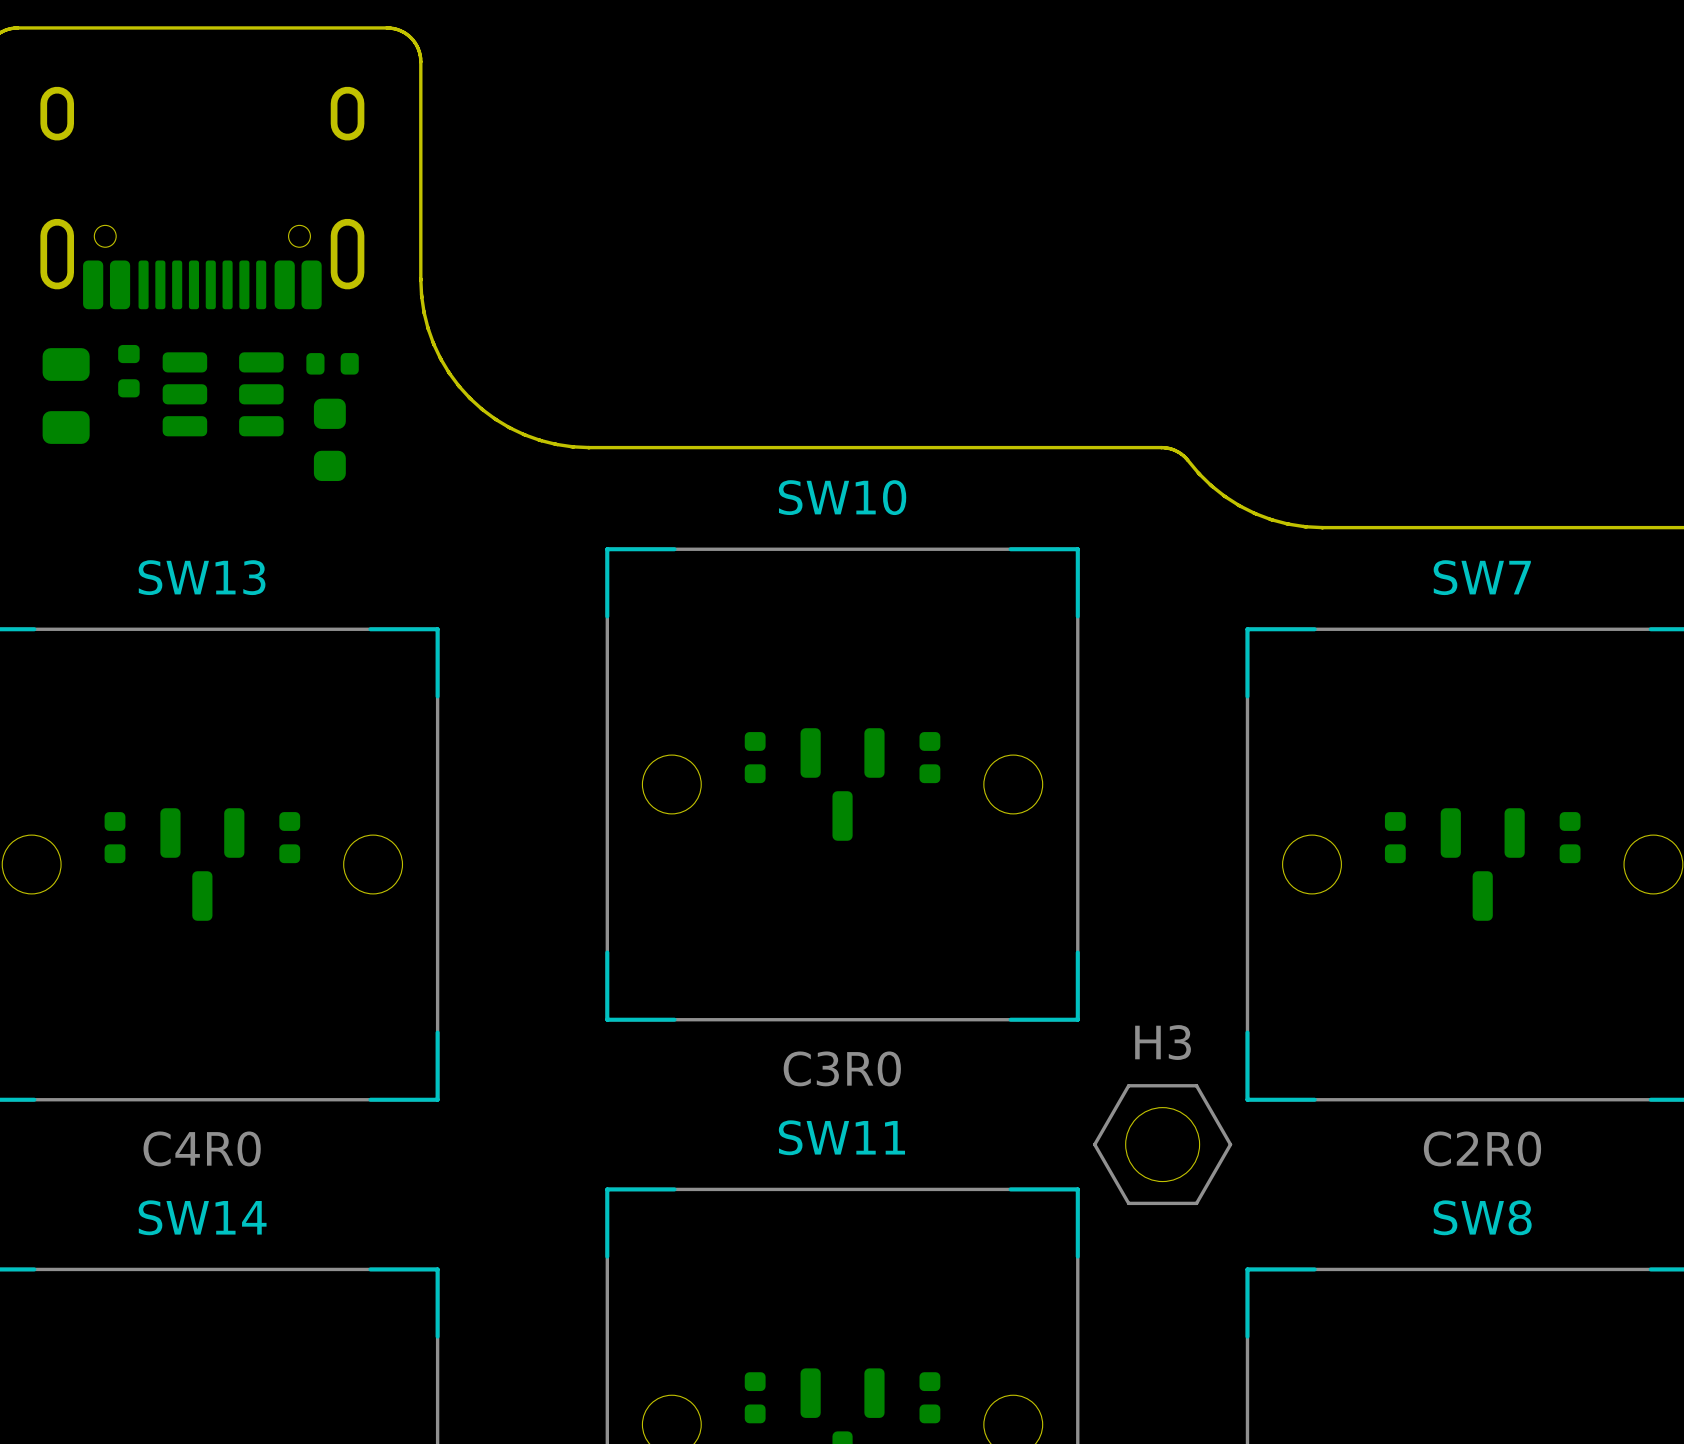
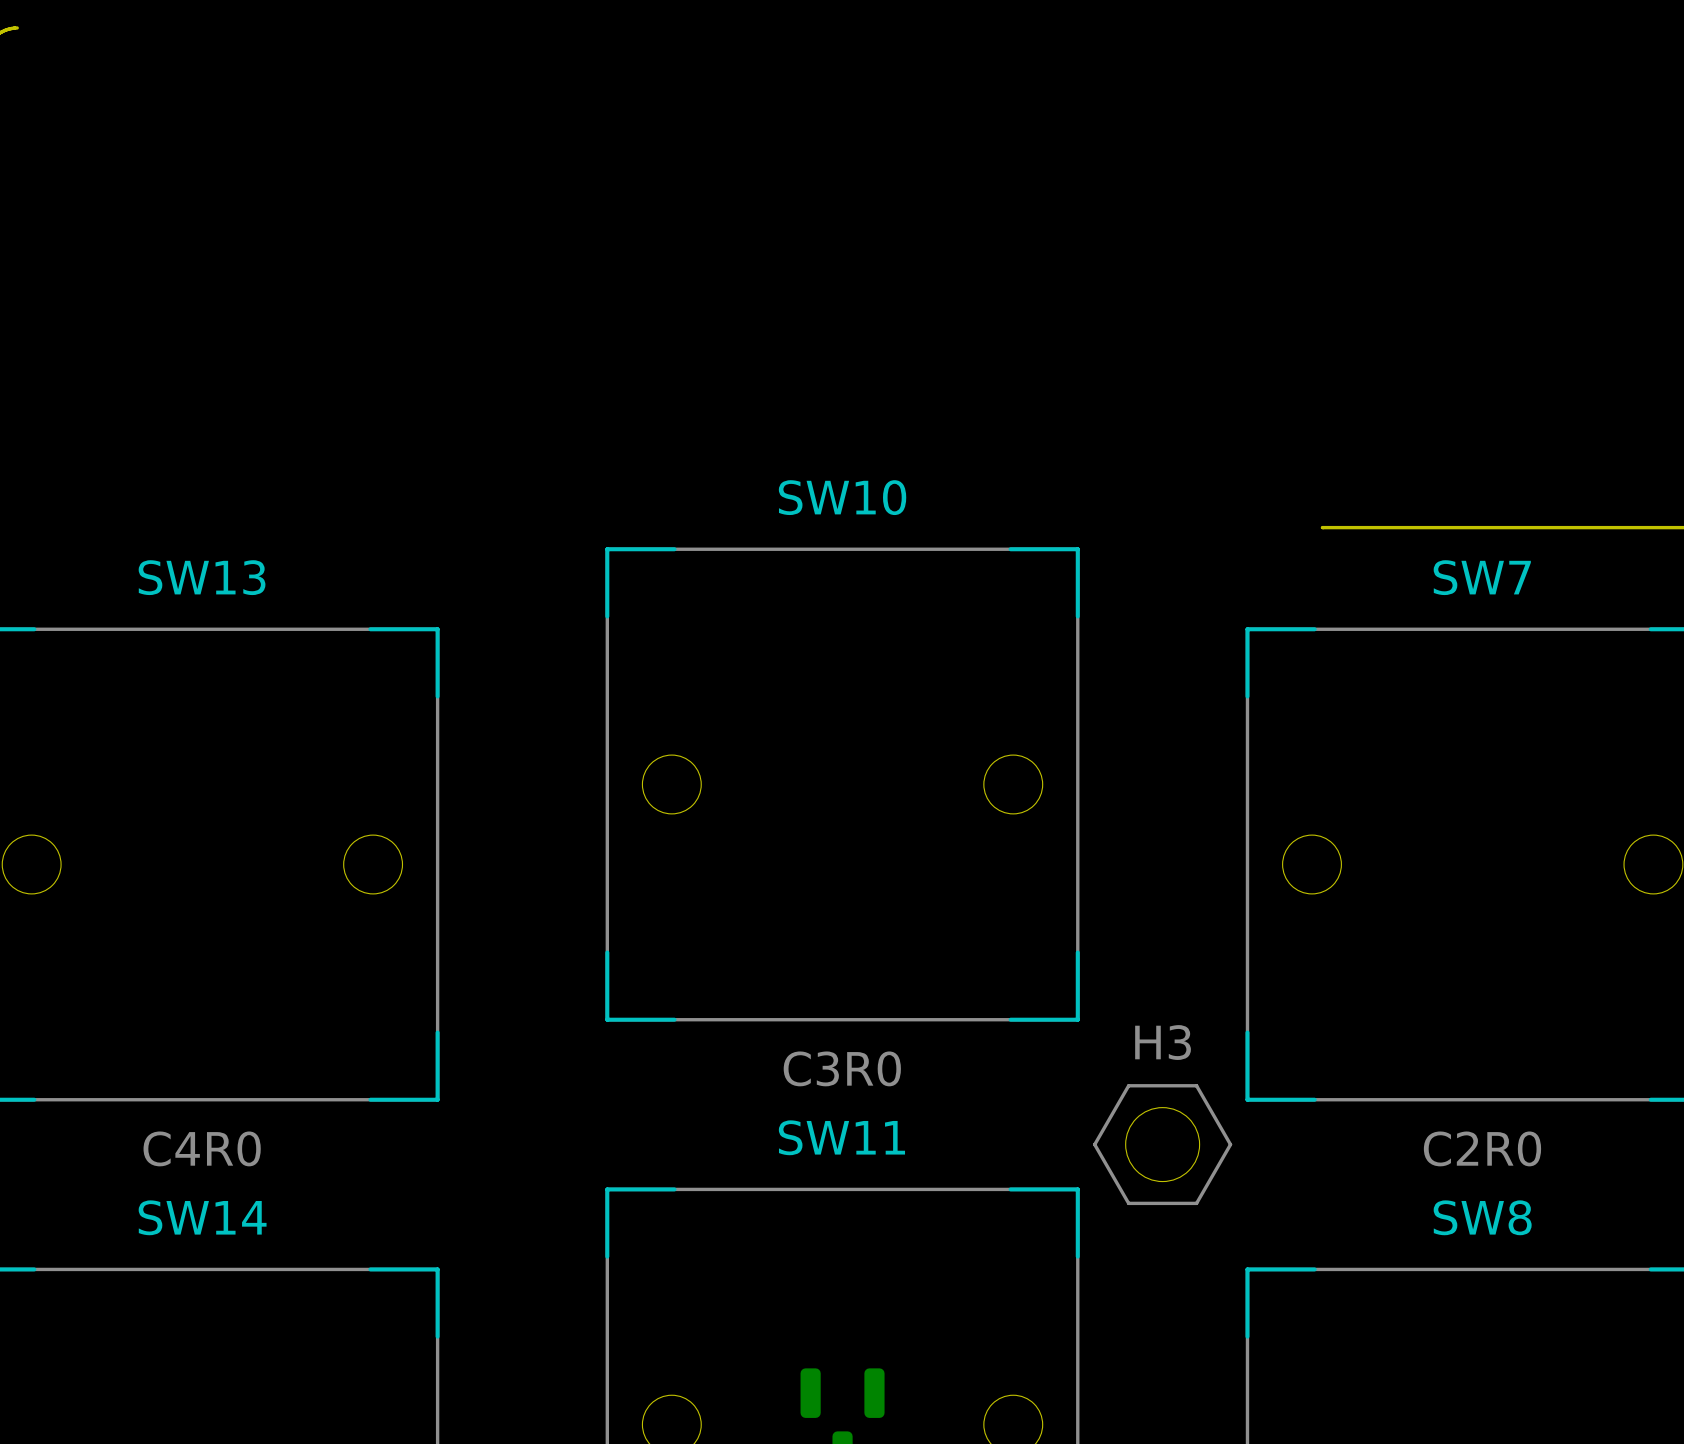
board edge: (17, 27) (386, 27) -> none
board edge: (387, 27) (400, 30) (411, 38) (418, 49) (420, 61) -> none
board edge: (420, 61) (420, 278) -> none
part: (202, 198) -> none
board edge: (420, 280) (421, 295) -> none
board edge: (421, 296) (424, 312) -> none
board edge: (424, 312) (428, 328) -> none
board edge: (428, 328) (440, 358) -> none
board edge: (440, 358) (449, 372) -> none
part: (332, 363) -> none
part: (128, 371) -> none
board edge: (449, 373) (458, 386) -> none
board edge: (459, 386) (469, 398) -> none
part: (223, 394) -> none
part: (66, 396) -> none
board edge: (470, 398) (482, 409) -> none
board edge: (482, 409) (495, 419) -> none
board edge: (495, 419) (509, 427) -> none
board edge: (509, 427) (524, 434) -> none
board edge: (524, 434) (539, 440) -> none
part: (329, 439) -> none
board edge: (540, 440) (555, 444) -> none
board edge: (556, 444) (572, 446) -> none
board edge: (572, 446) (588, 447) -> none
board edge: (589, 447) (1161, 447) (1180, 453) (1198, 473) -> none
board edge: (1199, 473) (1211, 485) -> none
board edge: (1211, 485) (1224, 496) -> none
board edge: (1225, 496) (1239, 505) -> none
board edge: (1239, 505) (1254, 513) -> none
board edge: (1255, 513) (1271, 519) -> none
board edge: (1271, 519) (1287, 523) -> none
board edge: (1288, 524) (1304, 526) -> none
board edge: (1305, 526) (1322, 527) -> none
part: (755, 757) -> none
part: (929, 757) -> none
part: (842, 784) -> none
part: (115, 837) -> none
part: (289, 837) -> none
part: (1395, 837) -> none
part: (1570, 837) -> none
part: (202, 864) -> none
part: (1482, 864) -> none
part: (755, 1397) -> none
part: (929, 1397) -> none

